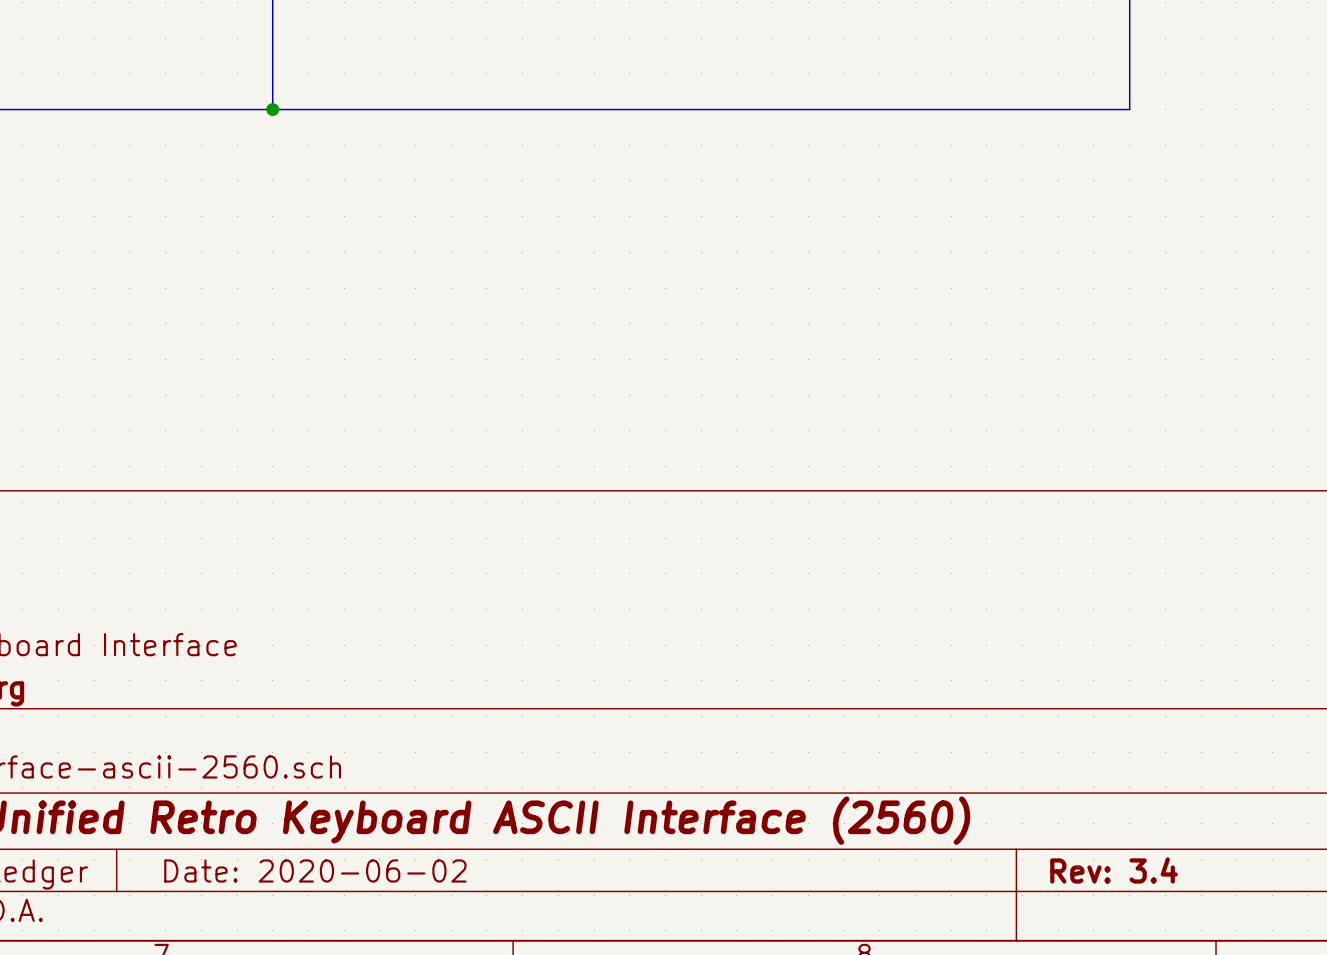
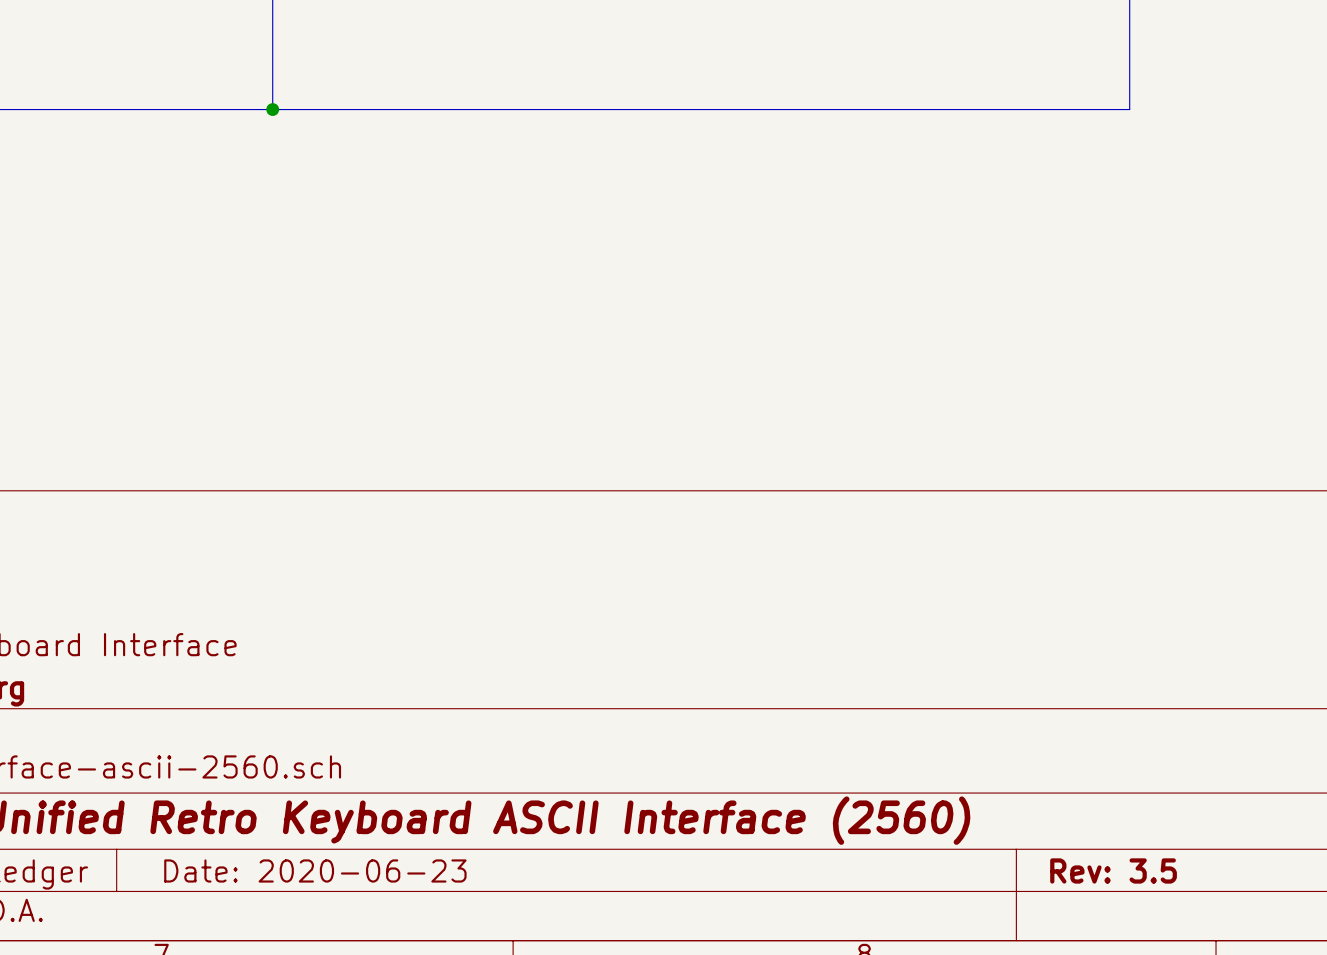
title block: Date: 2020-06-02 (315, 870) -> Date: 2020-06-23 (315, 870)
title block: Rev: 3.4 (1114, 870) -> Rev: 3.5 (1113, 870)

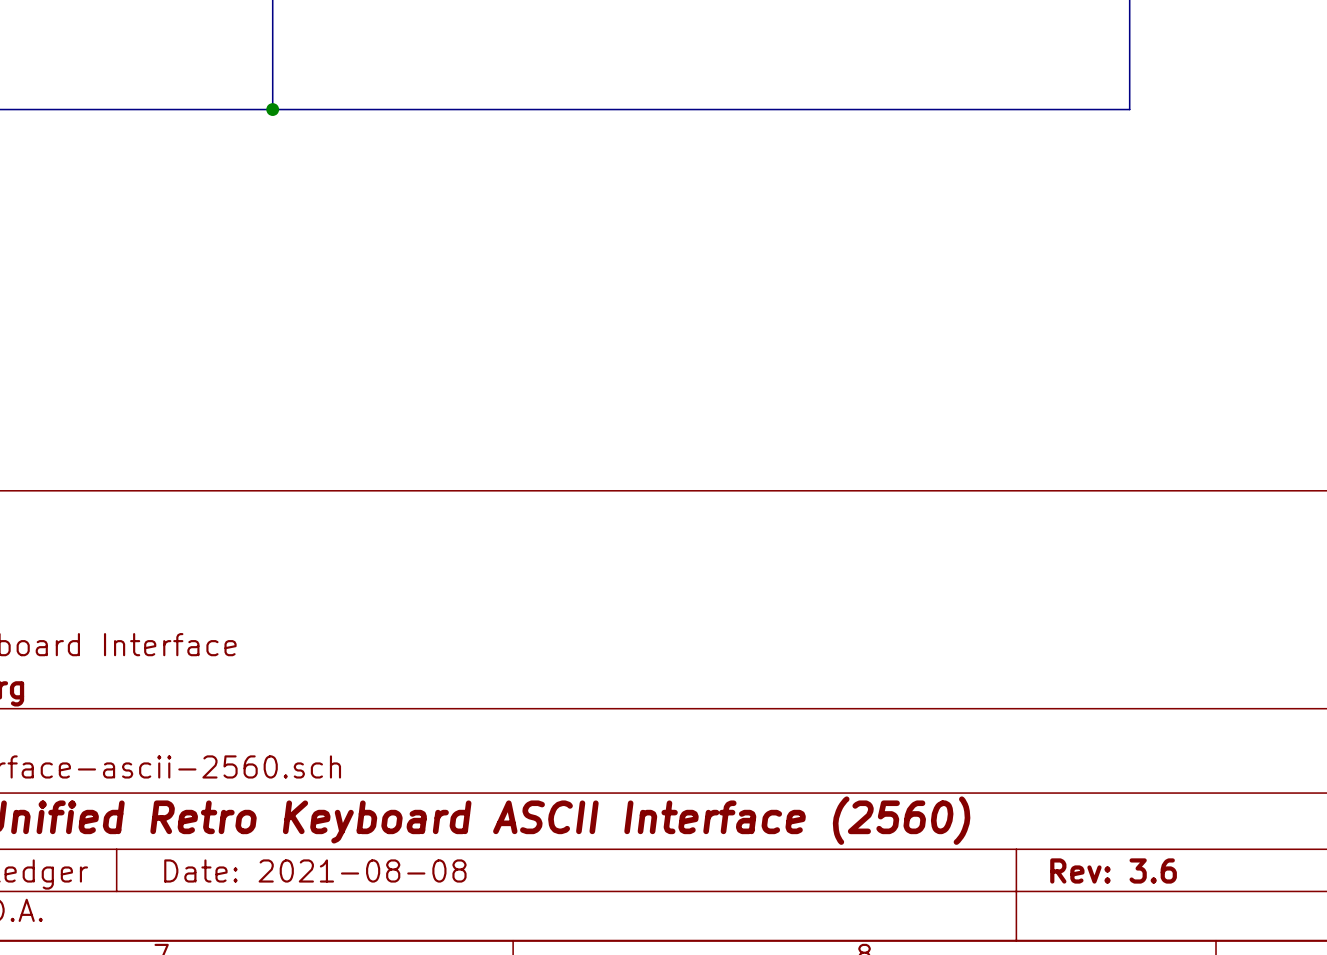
title block: Date: 2020-06-23 (315, 870) -> Date: 2021-08-08 (315, 870)
title block: Rev: 3.5 (1113, 870) -> Rev: 3.6 (1113, 870)

